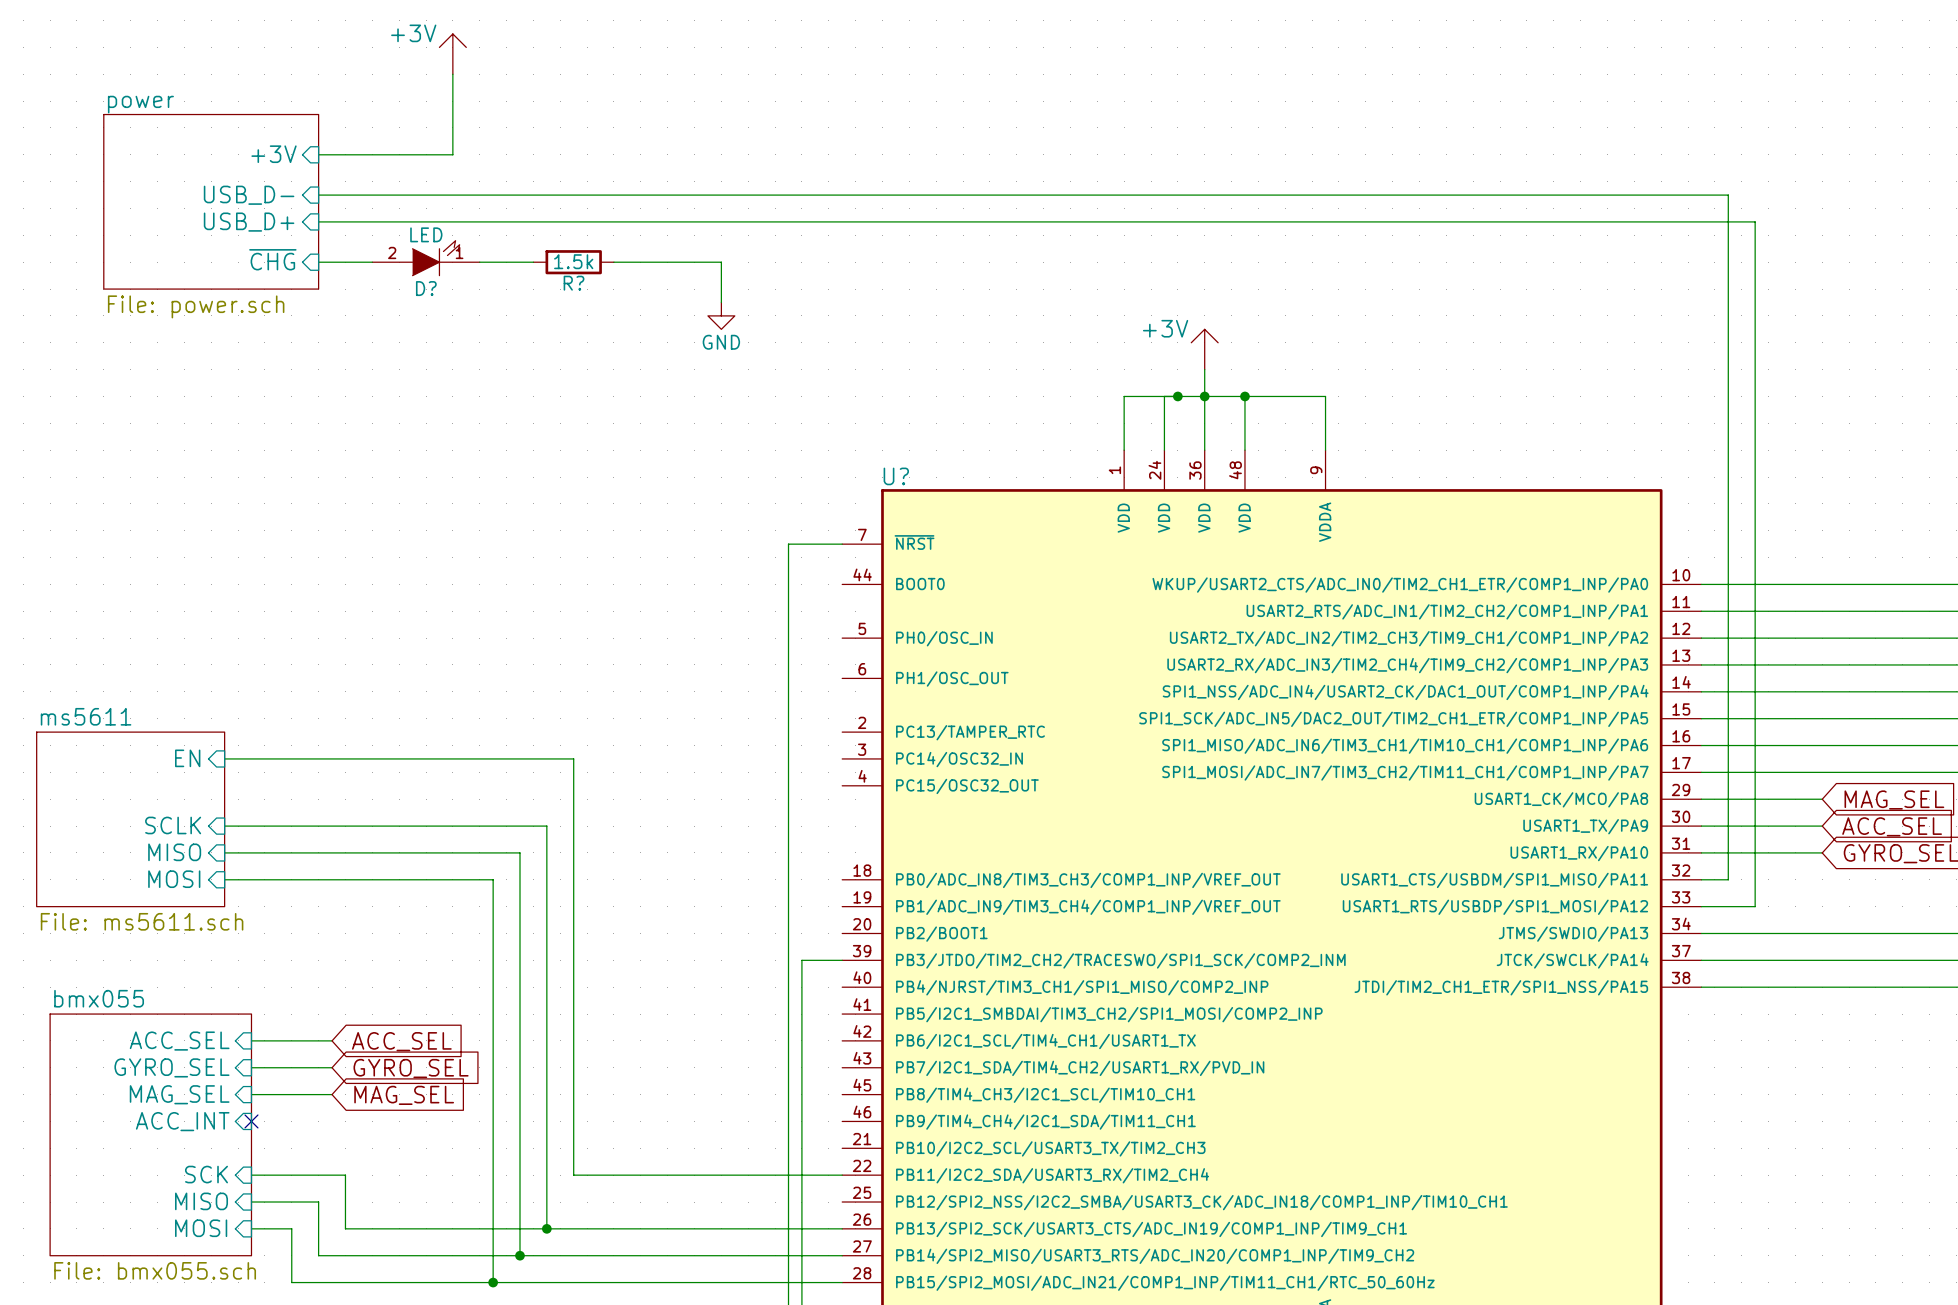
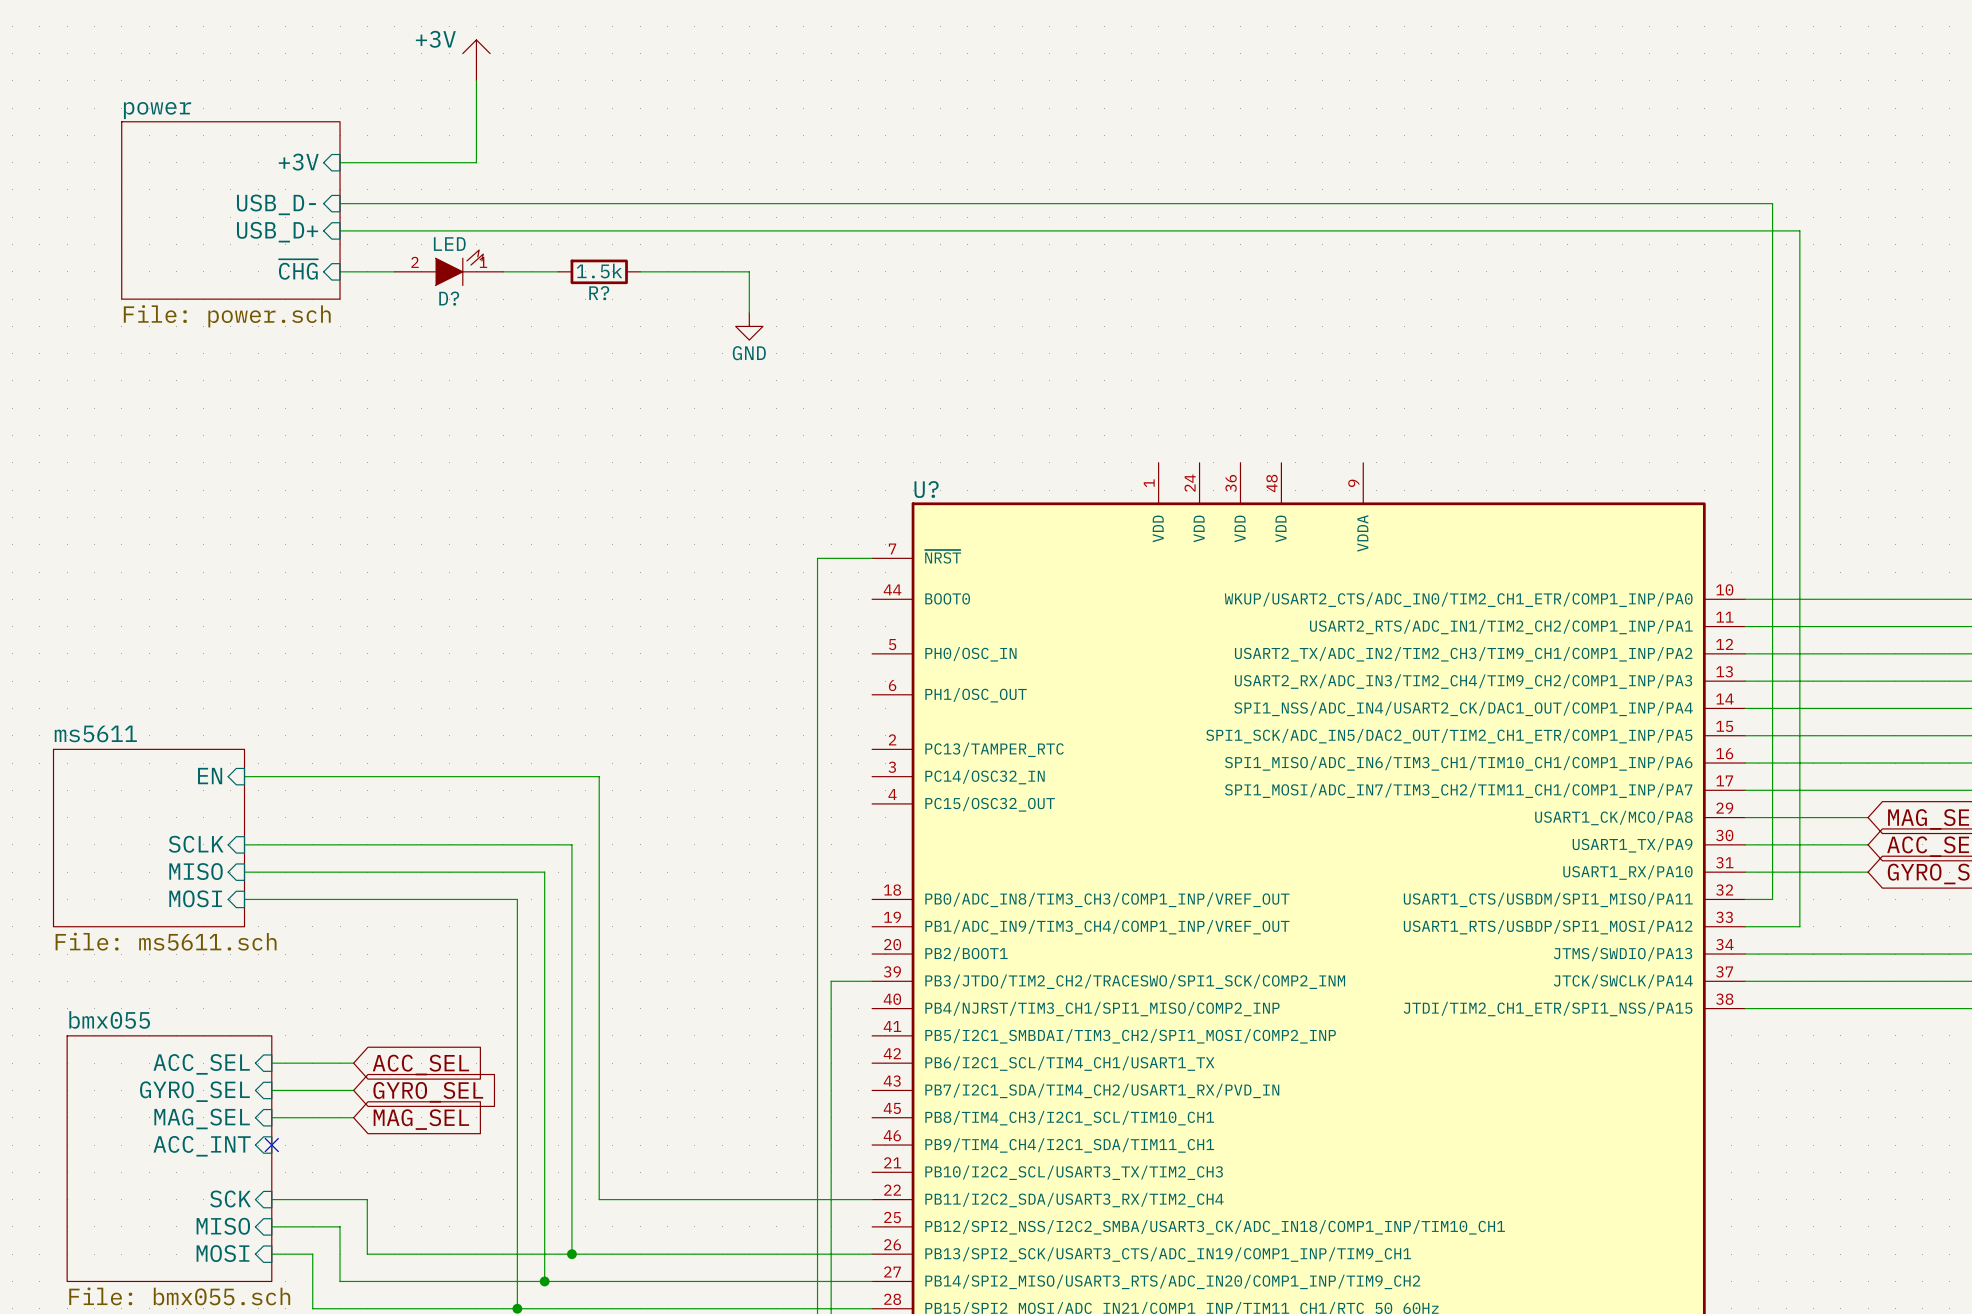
power symbol: +3V (1204, 349) -> none
wire: (1204, 369) (1204, 450) -> none
wire: (1164, 396) (1164, 450) -> none
junction: (1177, 396) -> none
junction: (1204, 396) -> none
wire: (1244, 396) (1244, 450) -> none
junction: (1244, 396) -> none
wire: (1124, 450) (1124, 396) (1325, 396) (1325, 450) -> none

